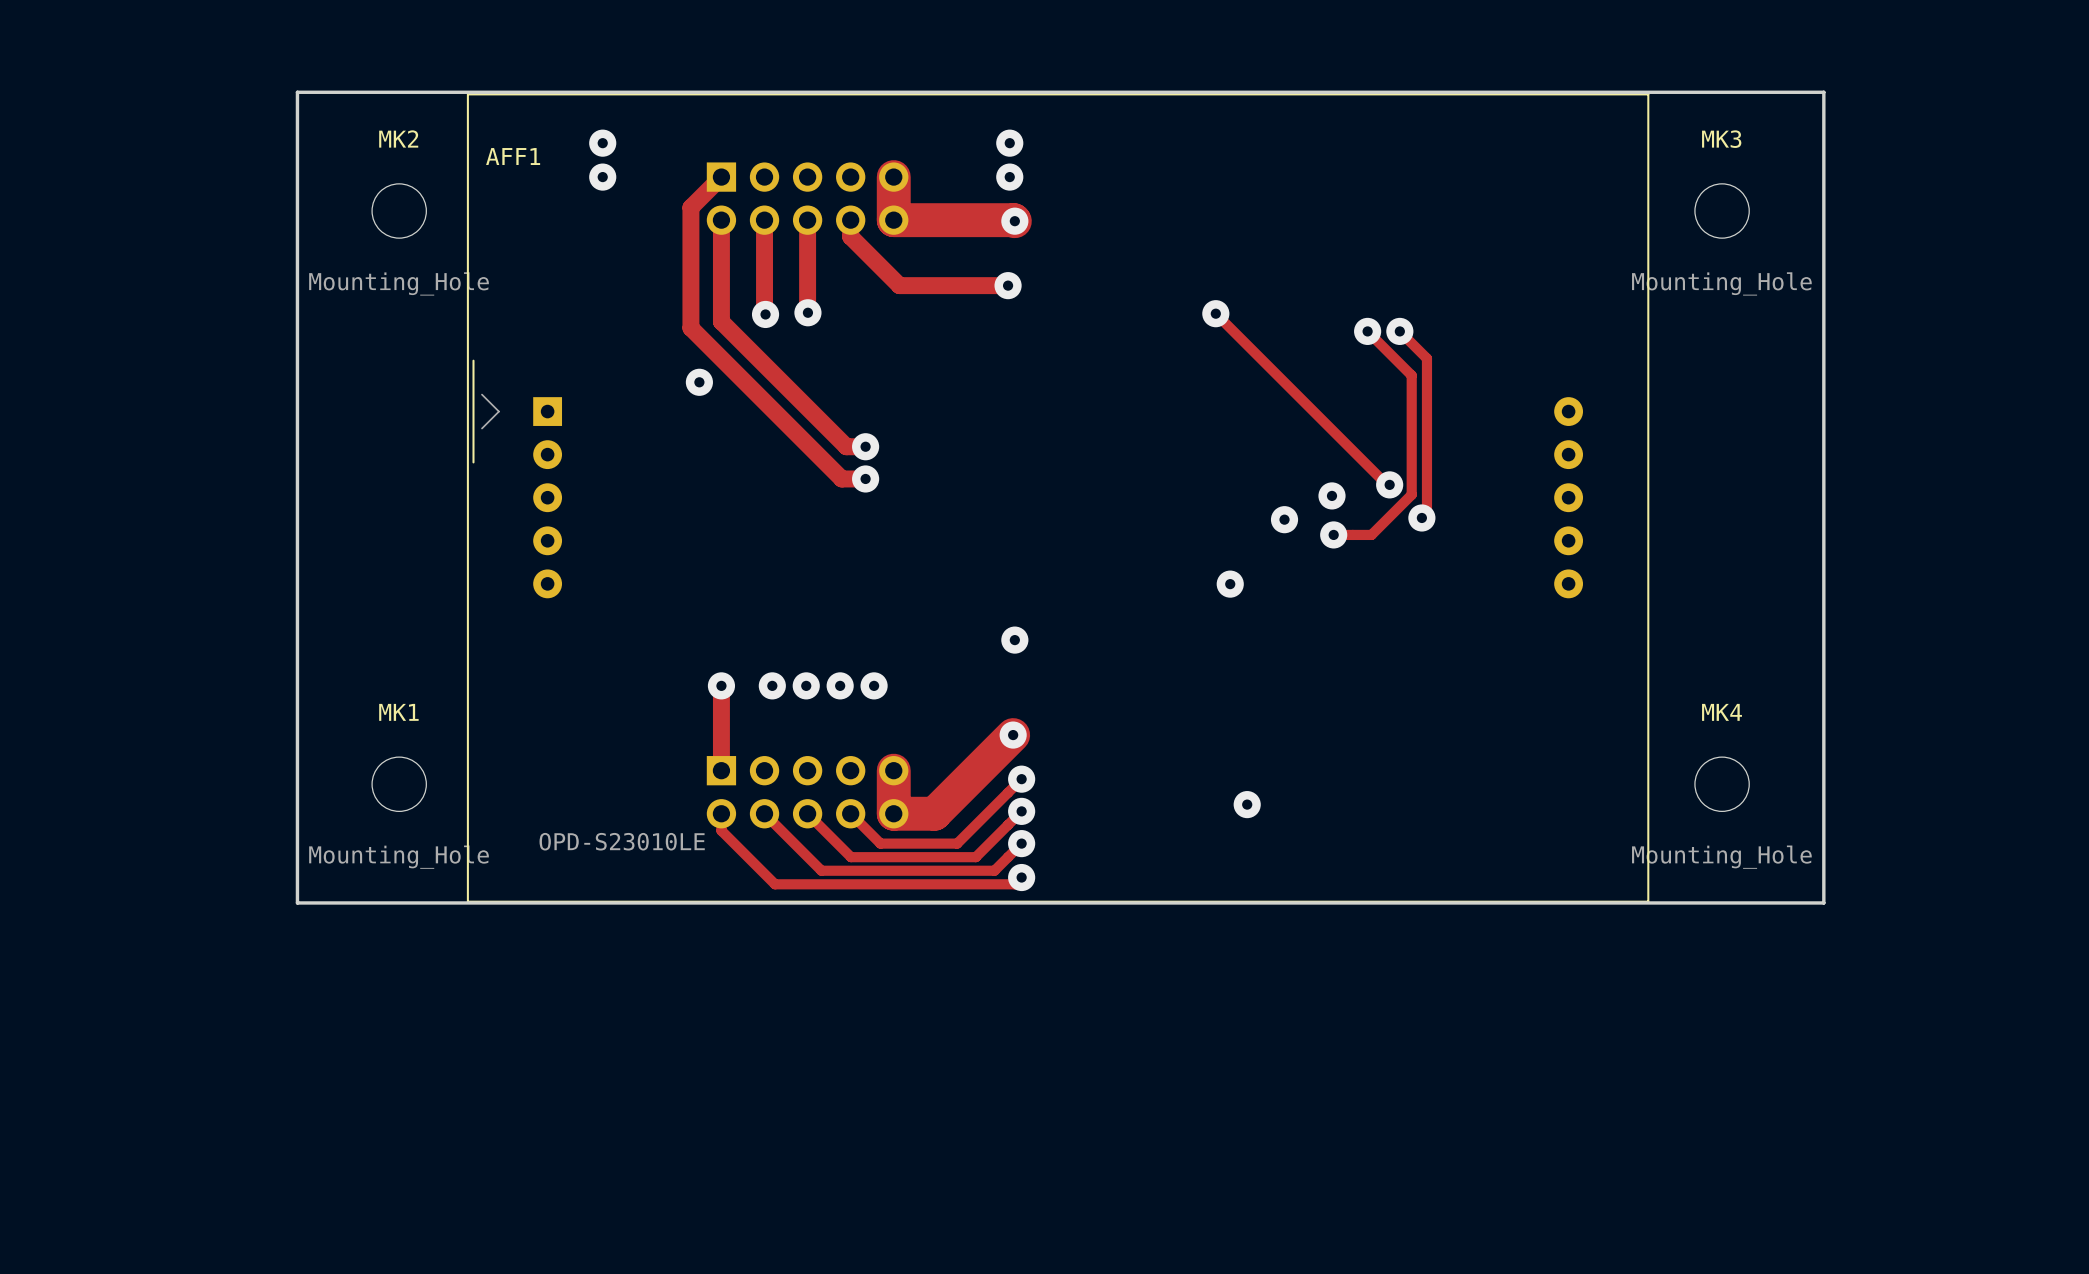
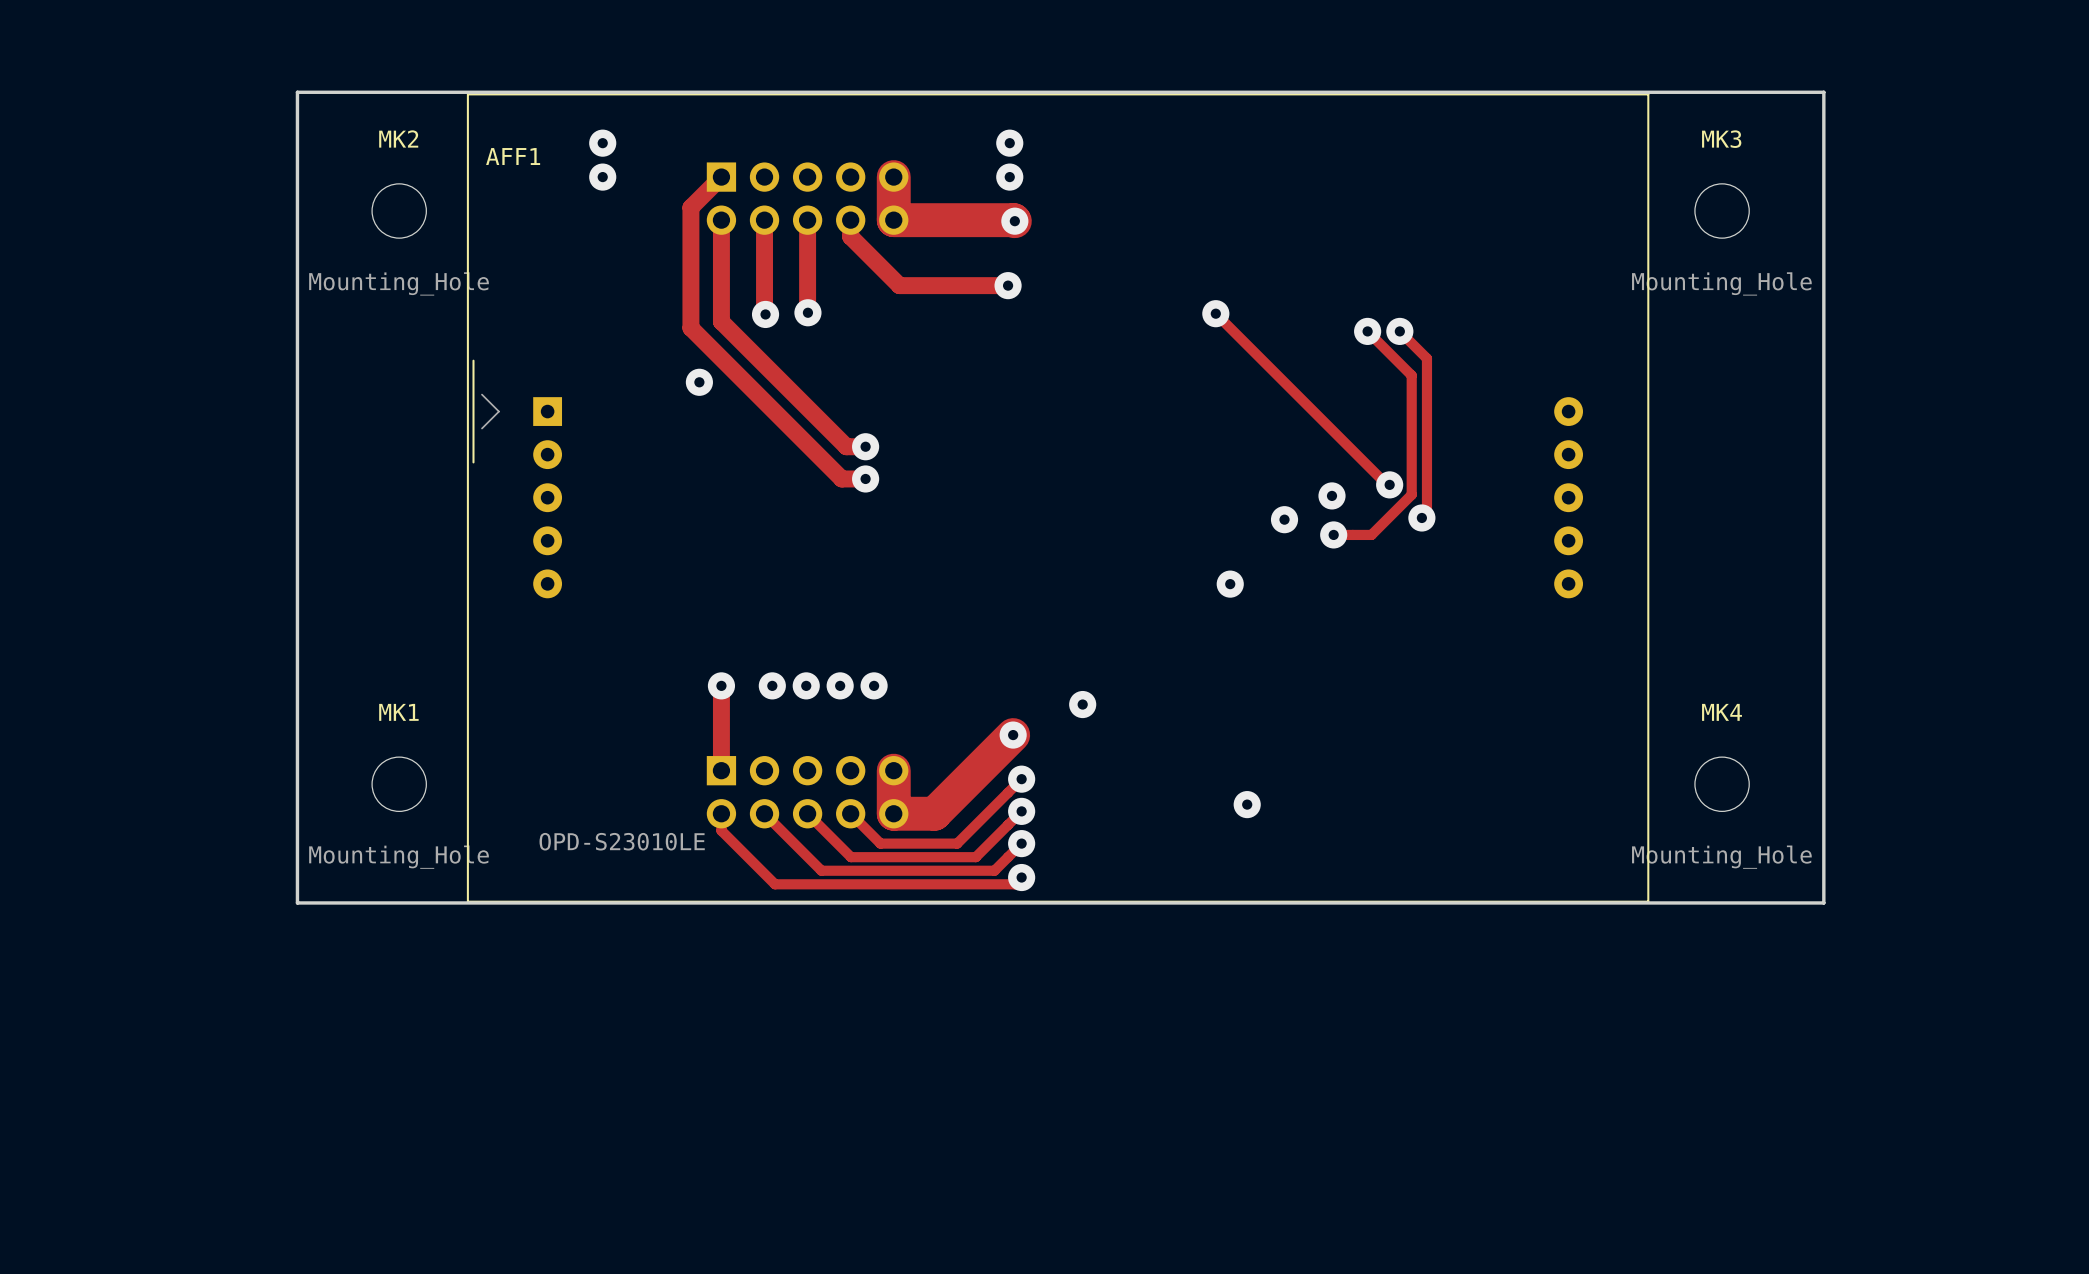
via position: (1014, 640) -> (1082, 704)

